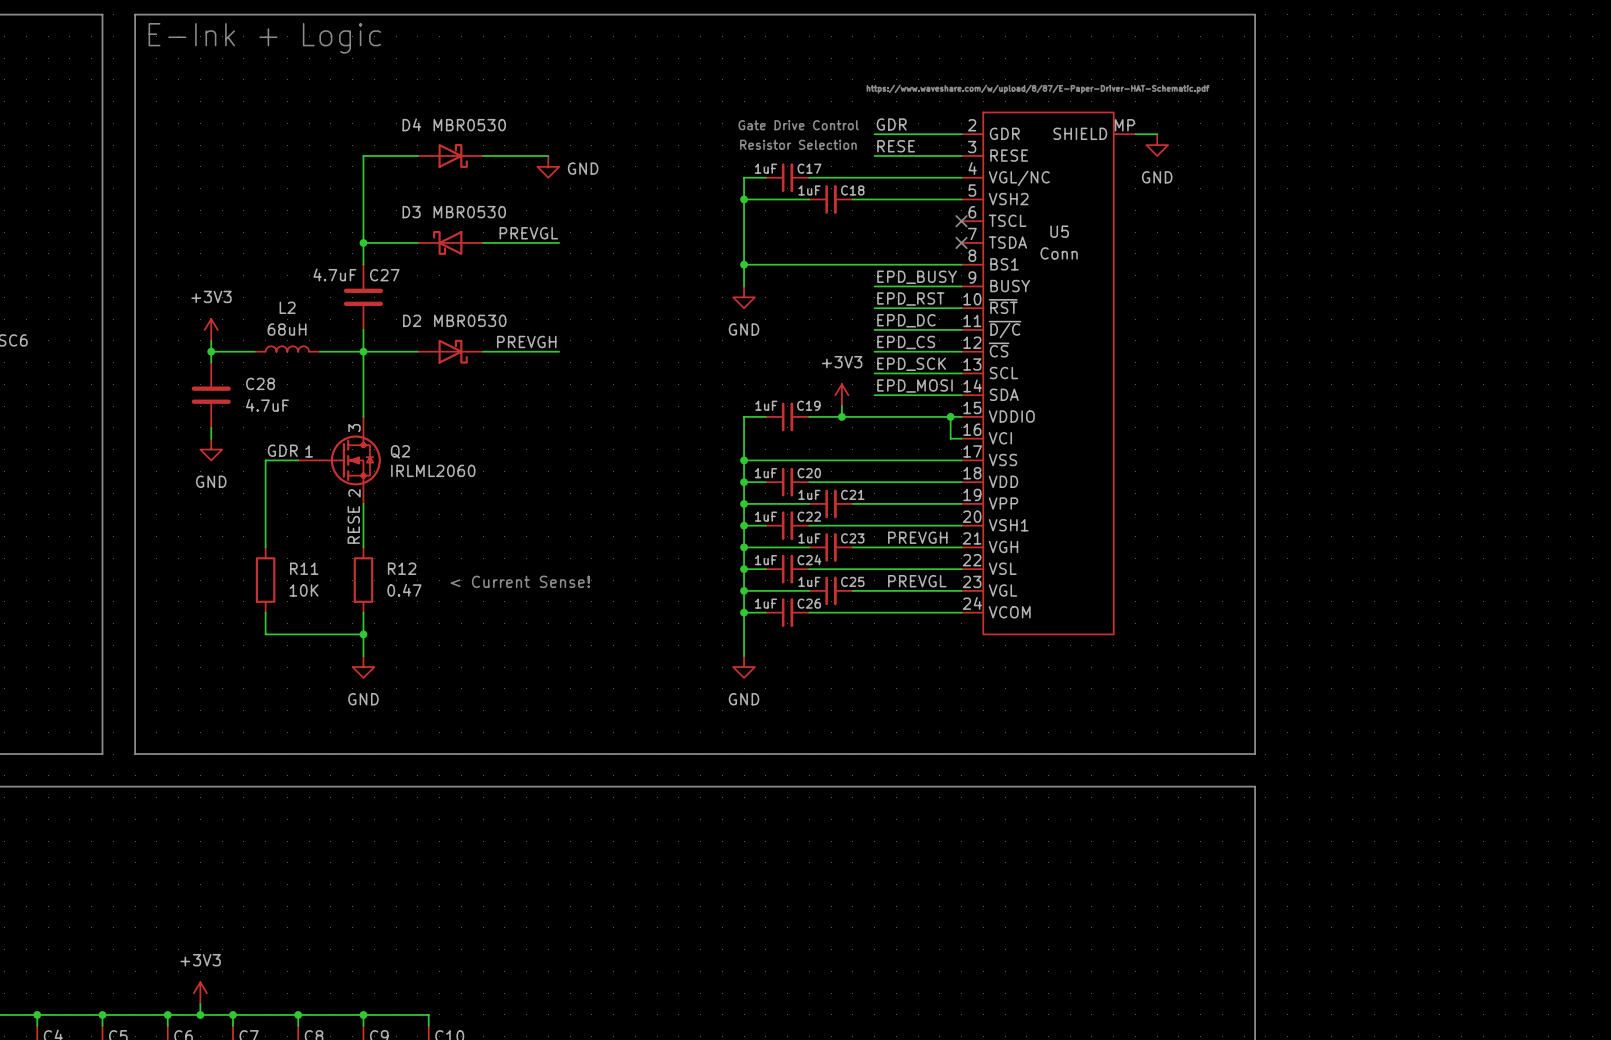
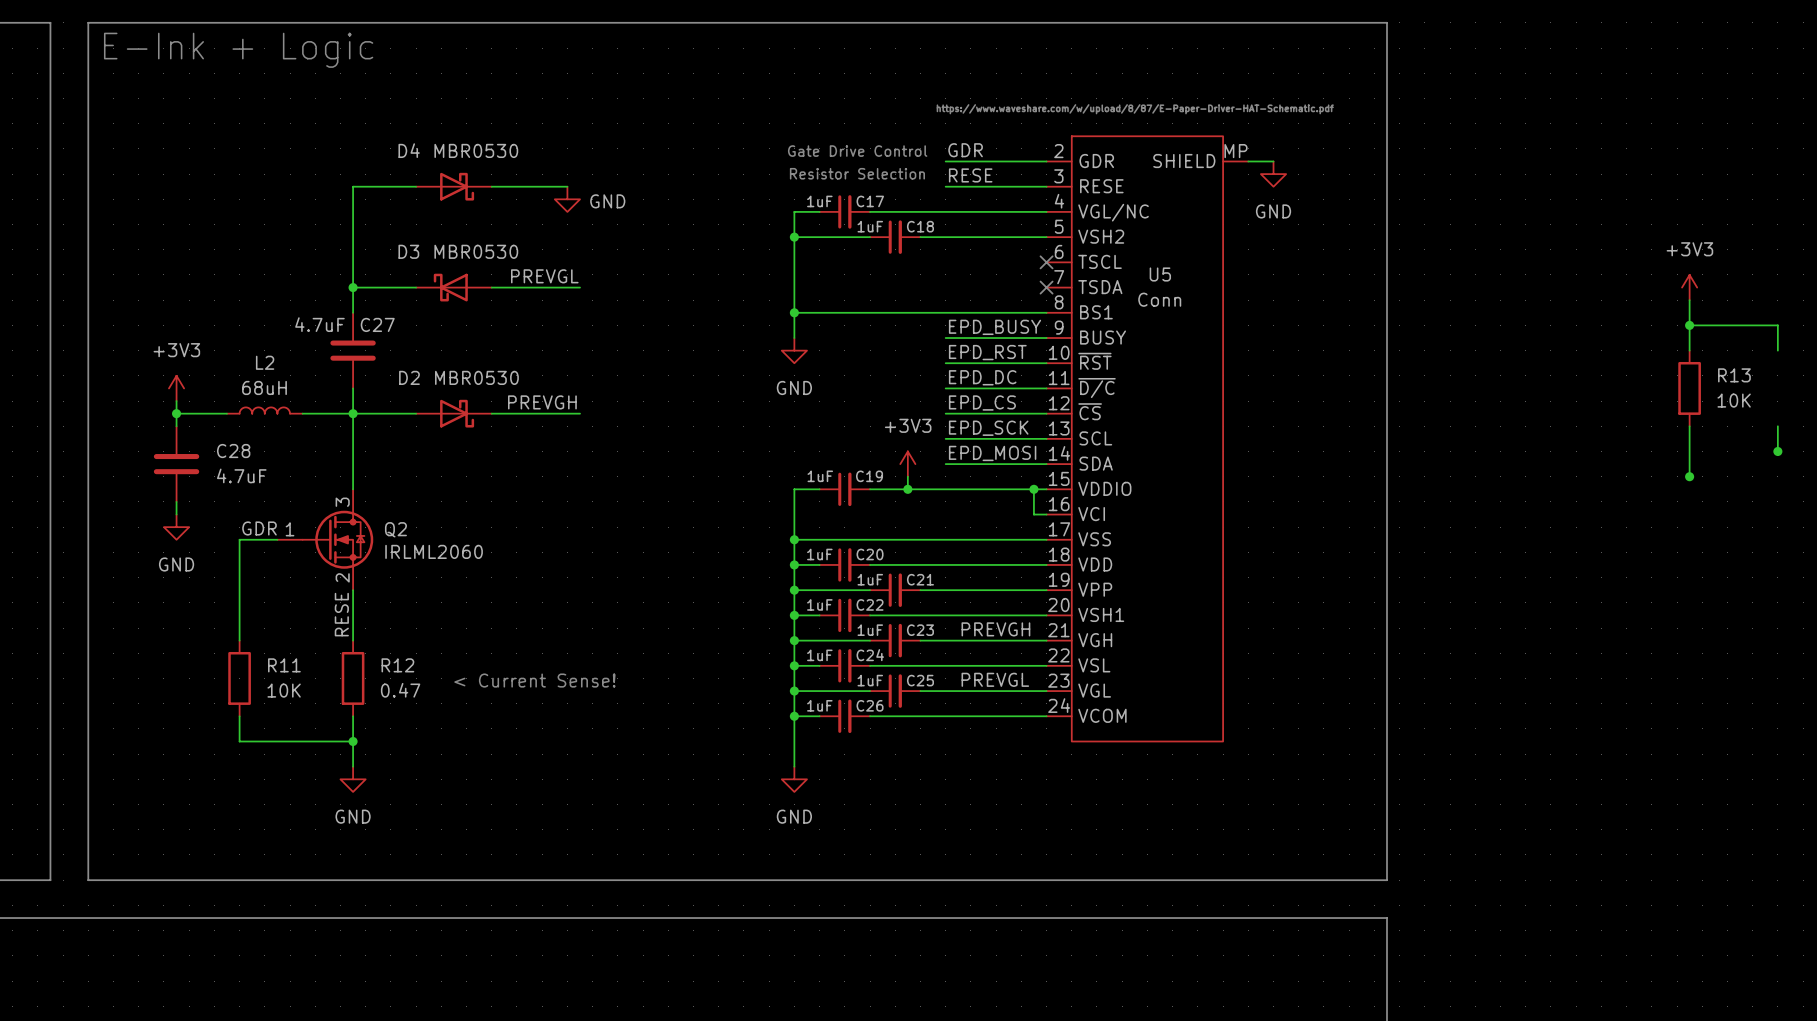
power symbol: none -> +3V3 (1689, 287)
wire: none -> (1689, 300) (1689, 350)
wire: none -> (1689, 325) (1777, 325) (1777, 350)
junction: none -> (1689, 325)
R13: none -> 10K (1689, 388)
wire: none -> (1689, 426) (1689, 476)
wire: none -> (1777, 426) (1777, 451)
junction: none -> (1777, 451)
junction: none -> (1689, 476)

